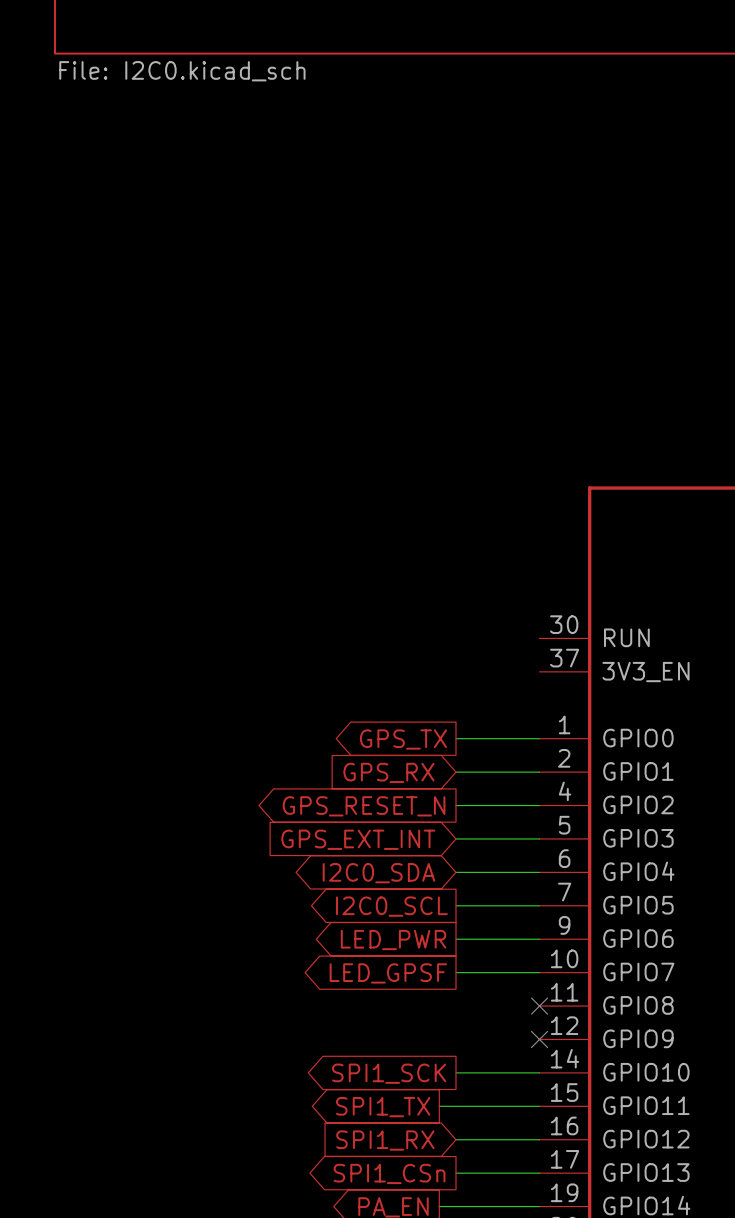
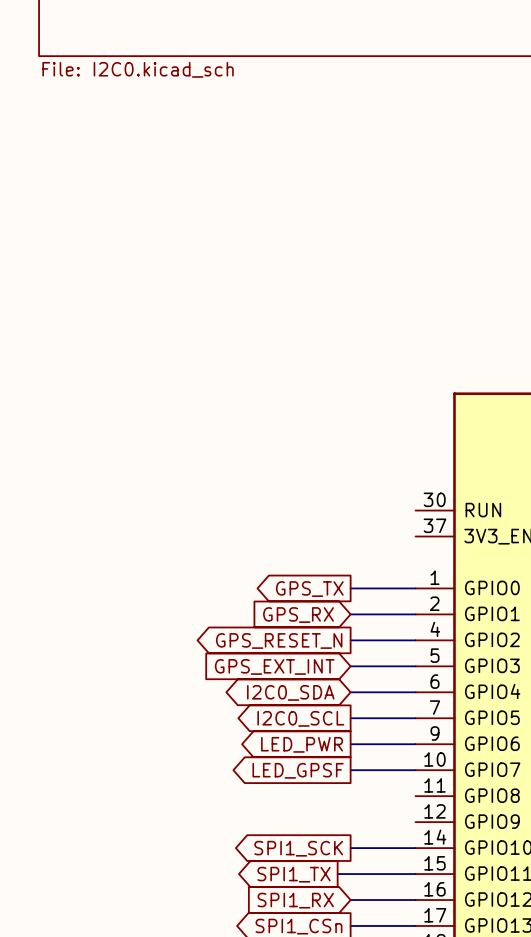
no-connect mark: (539, 1006) -> none
no-connect mark: (539, 1039) -> none

